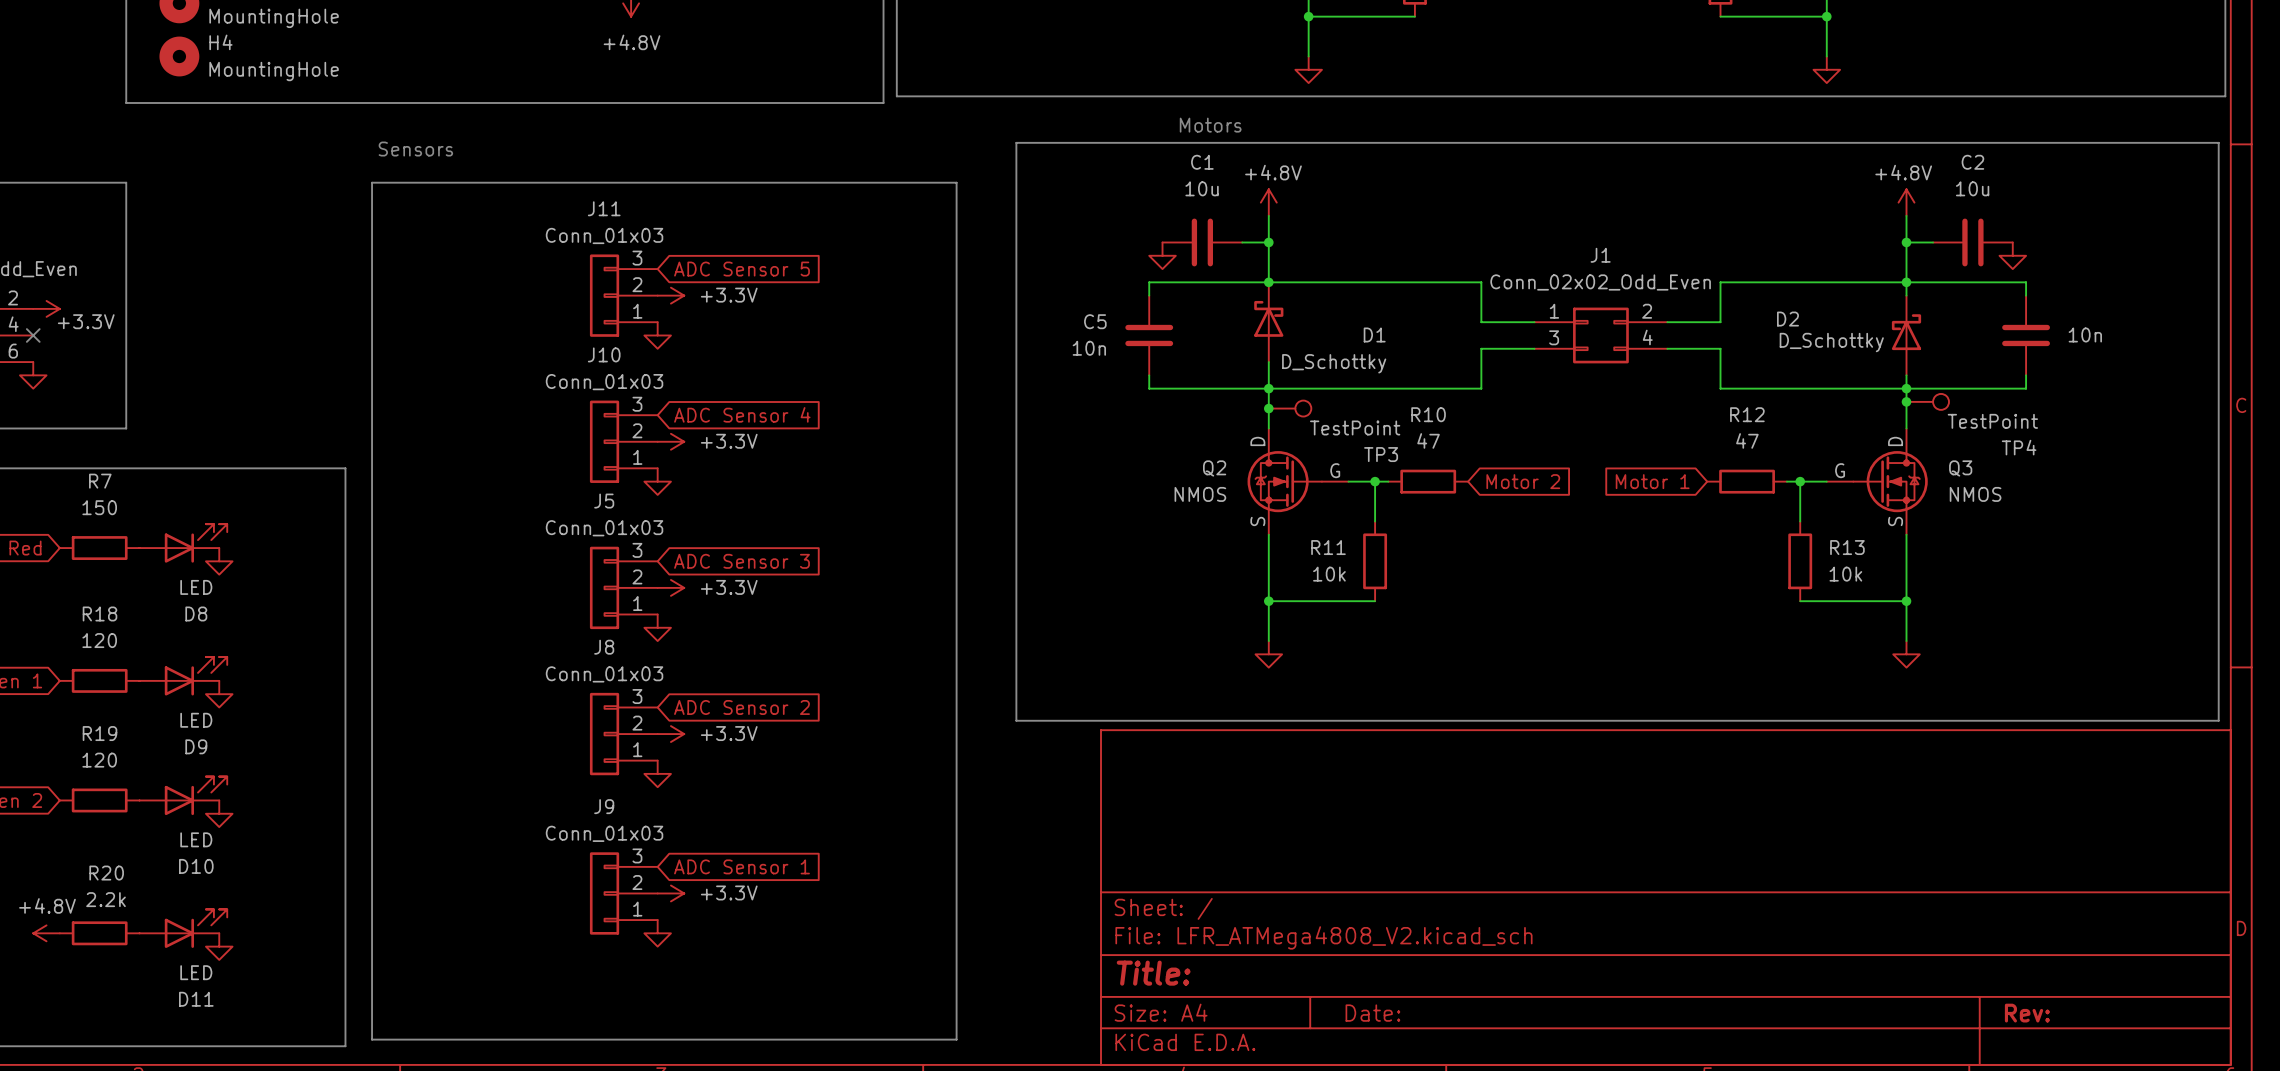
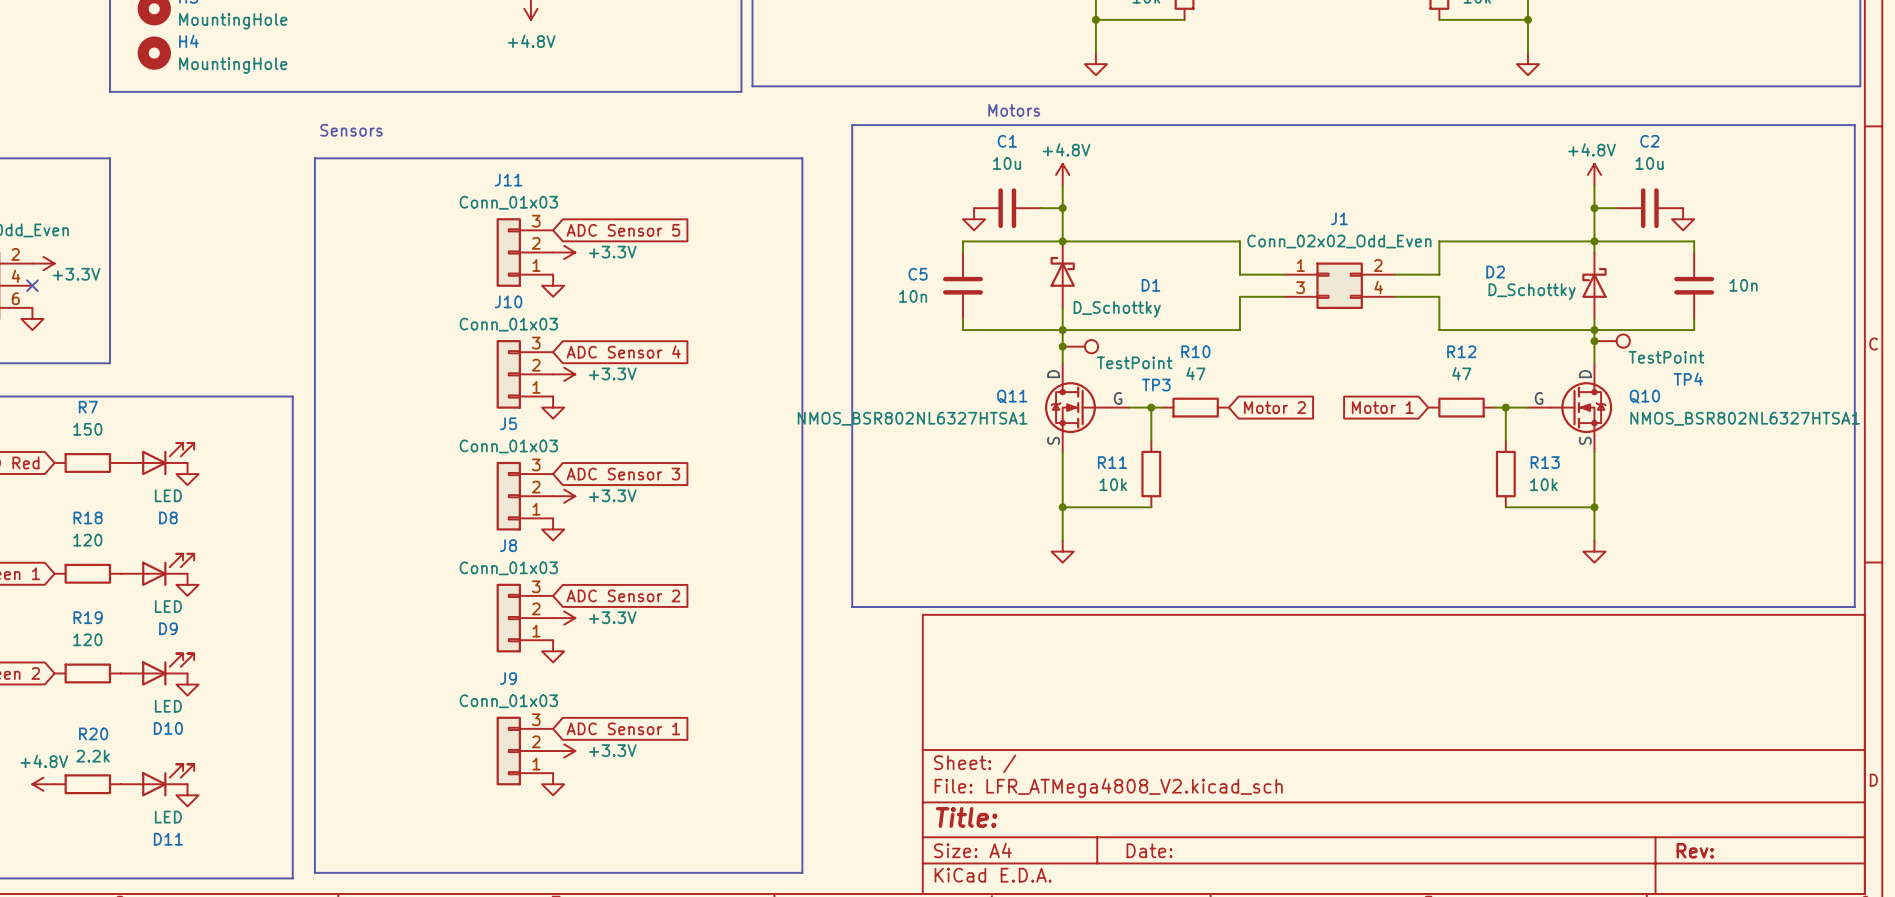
Q2 name: Q2 (1214, 468) -> Q11 (1012, 396)
Q3 name: Q3 (1960, 468) -> Q10 (1644, 396)
Q2 value: NMOS (1200, 494) -> NMOS_BSR802NL6327HTSA1 (912, 418)
Q3 value: NMOS (1975, 494) -> NMOS_BSR802NL6327HTSA1 (1745, 418)

